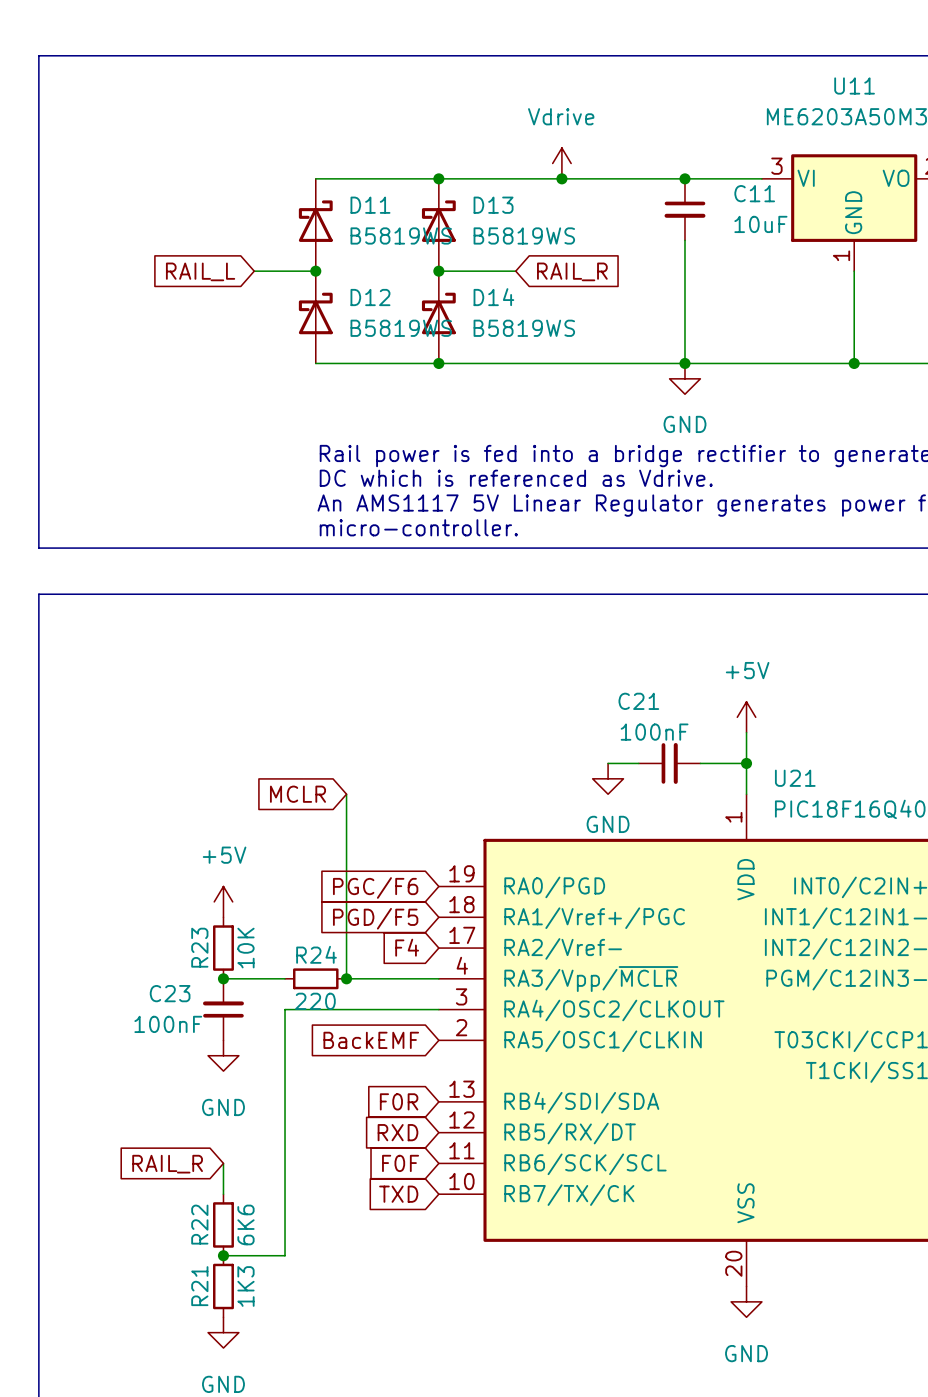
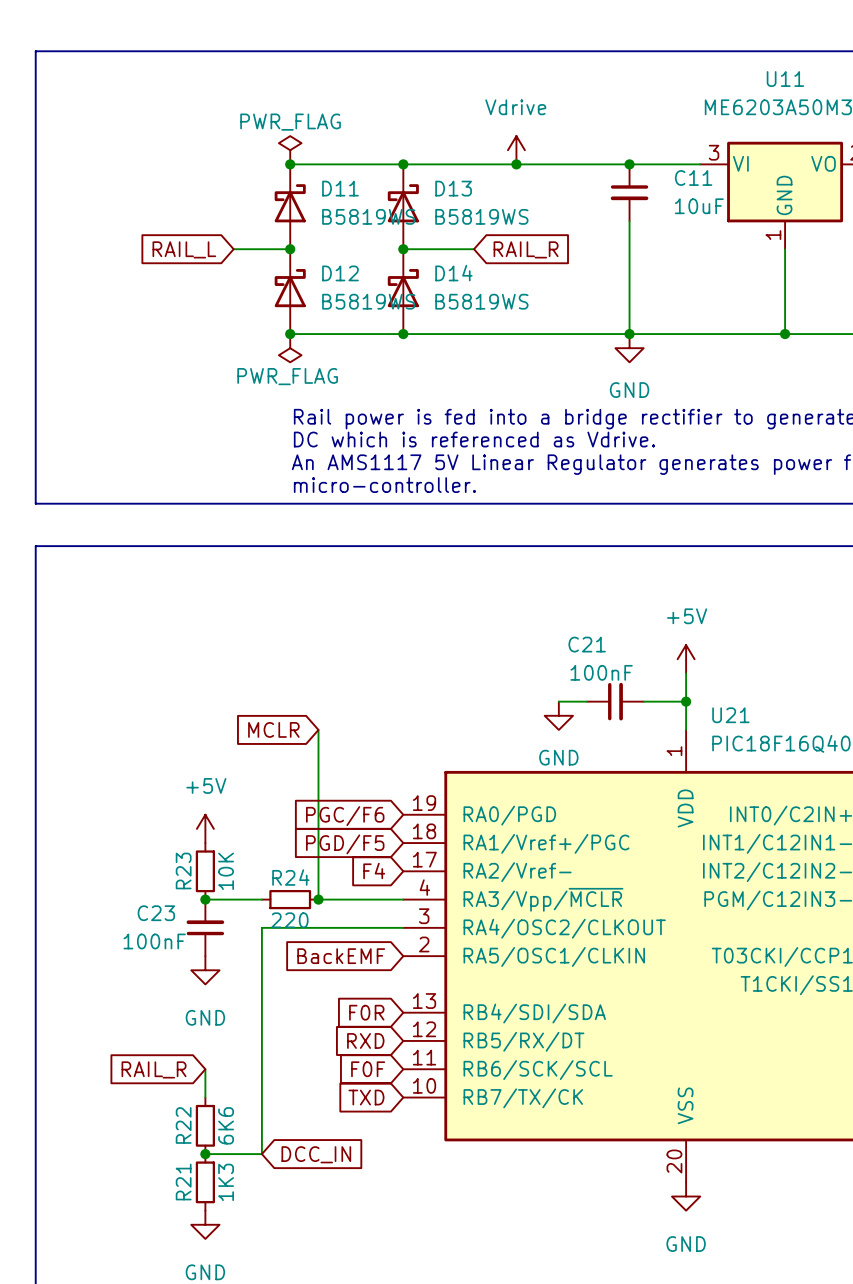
power symbol: none -> PWR_FLAG (290, 150)
junction: none -> (290, 164)
junction: none -> (290, 334)
power symbol: none -> PWR_FLAG (290, 348)
global label: none -> DCC_IN (316, 1154)

